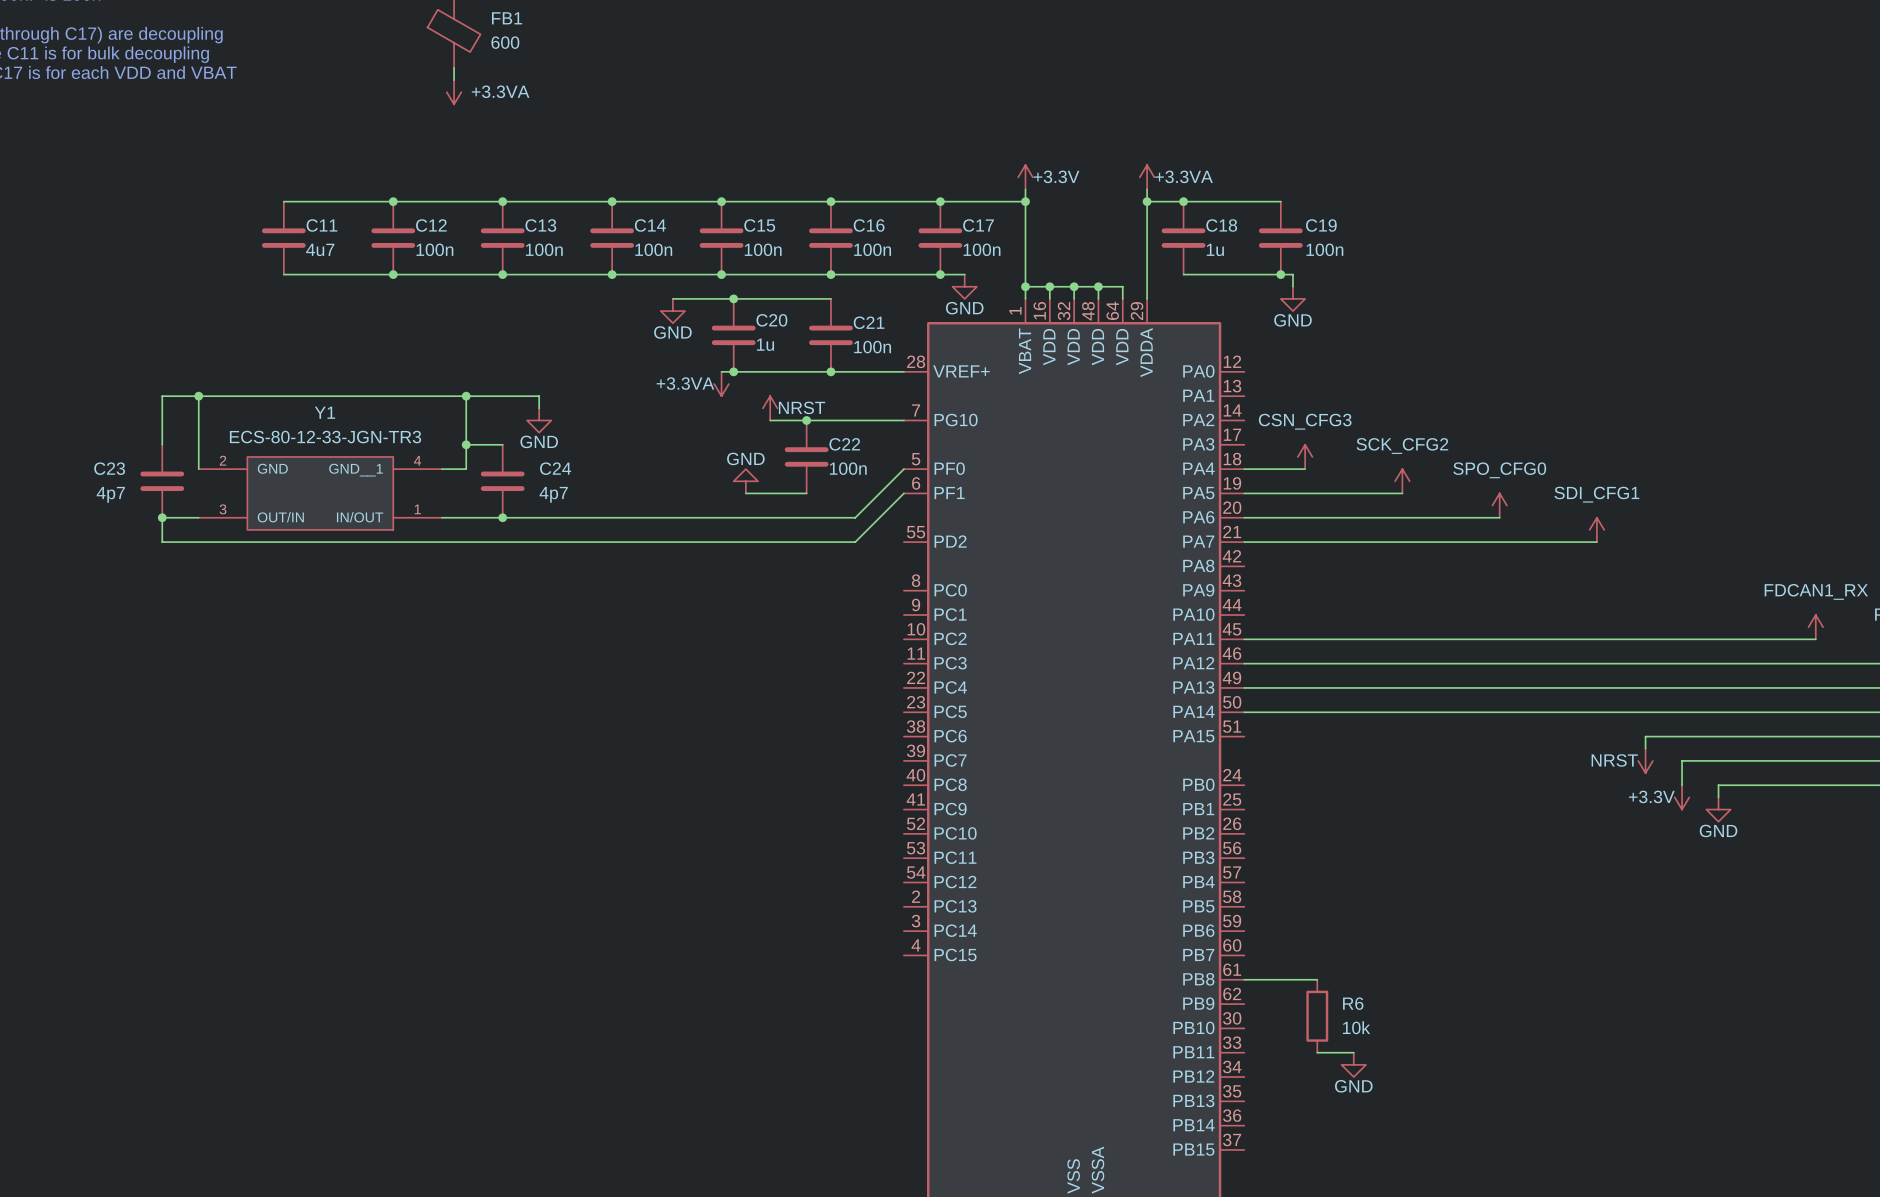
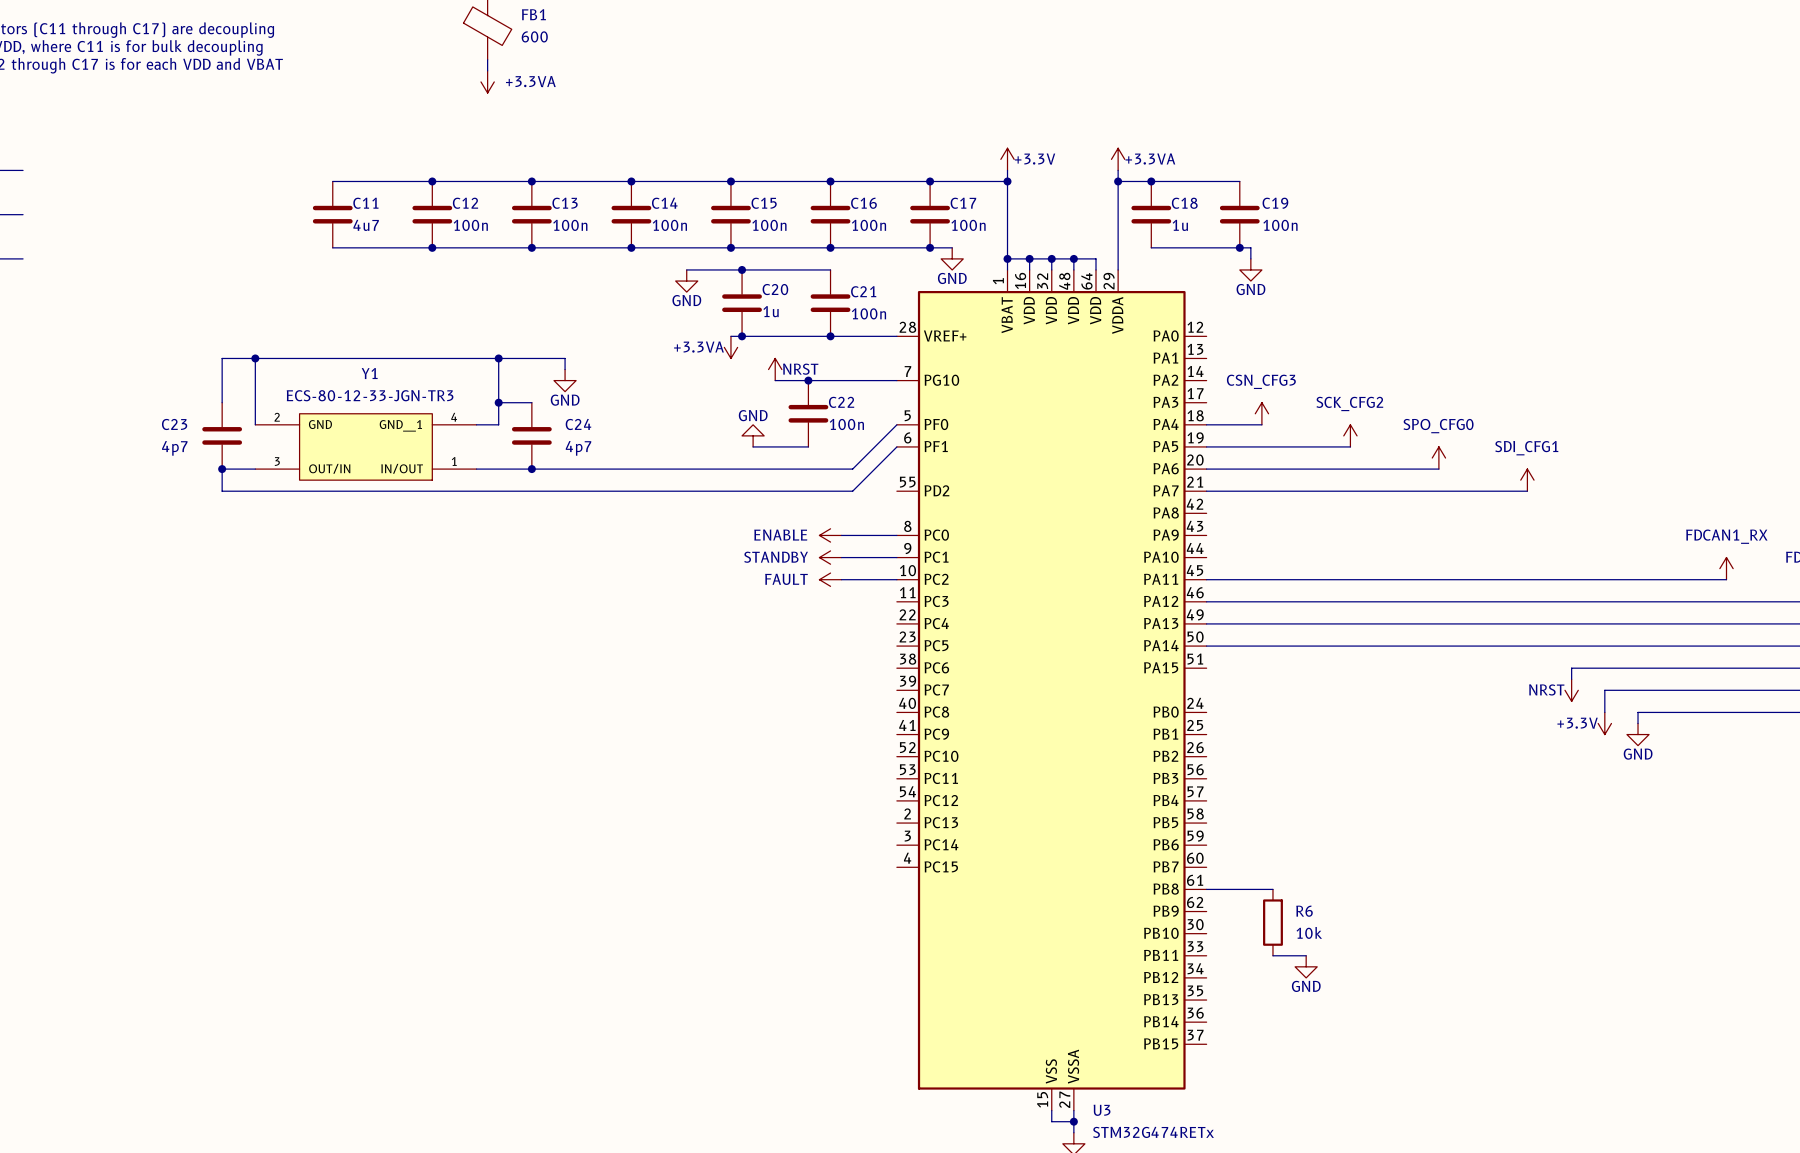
power symbol: none -> ENABLE (830, 535)
wire: none -> (841, 535) (896, 535)
power symbol: none -> STANDBY (830, 557)
wire: none -> (841, 557) (896, 557)
power symbol: none -> FAULT (830, 579)
wire: none -> (841, 579) (896, 579)

